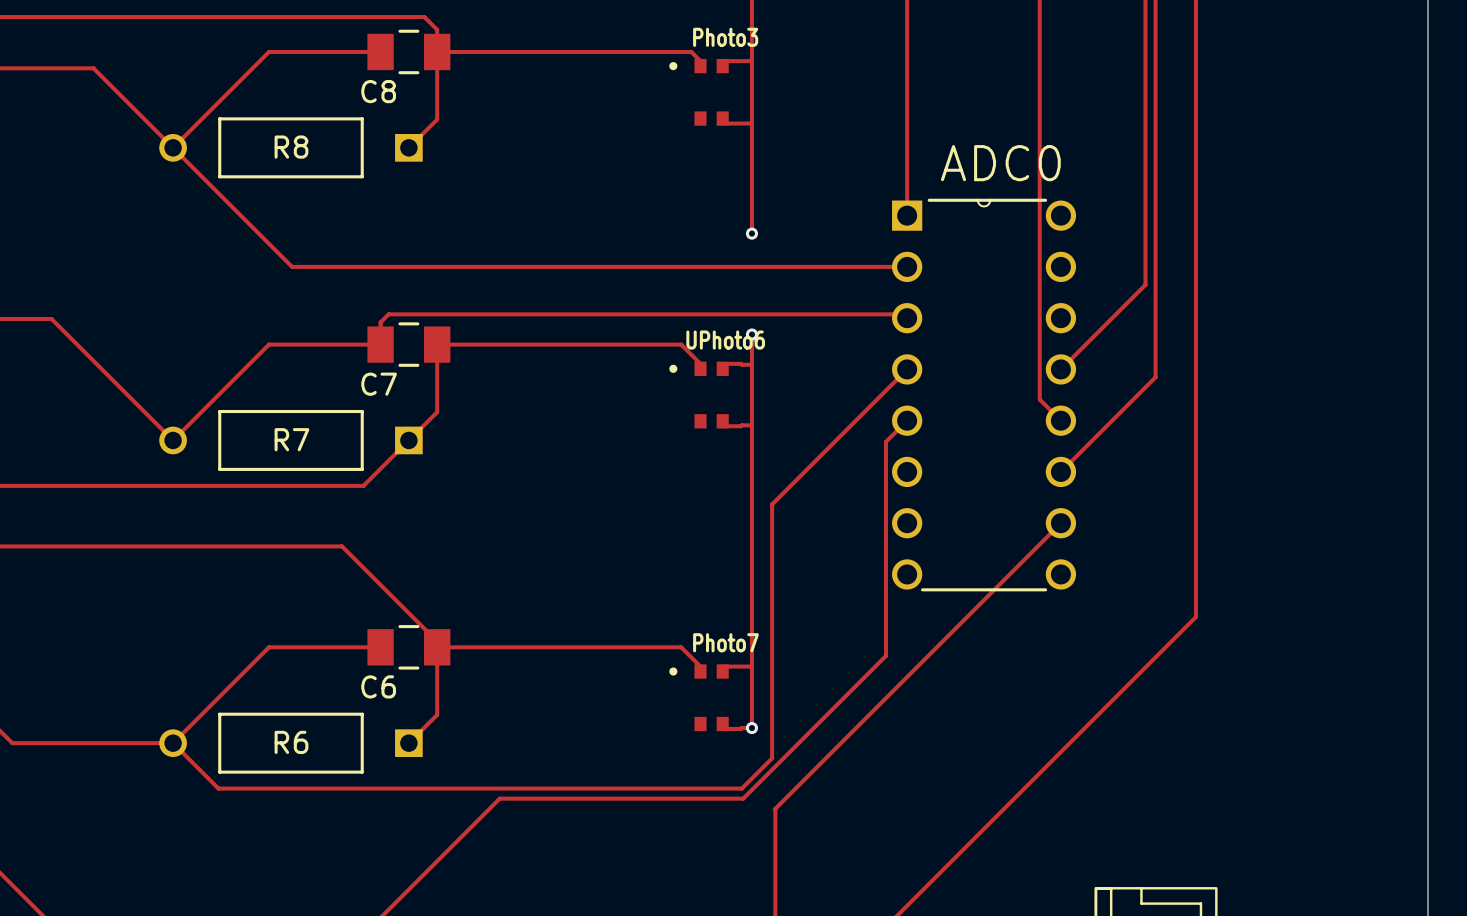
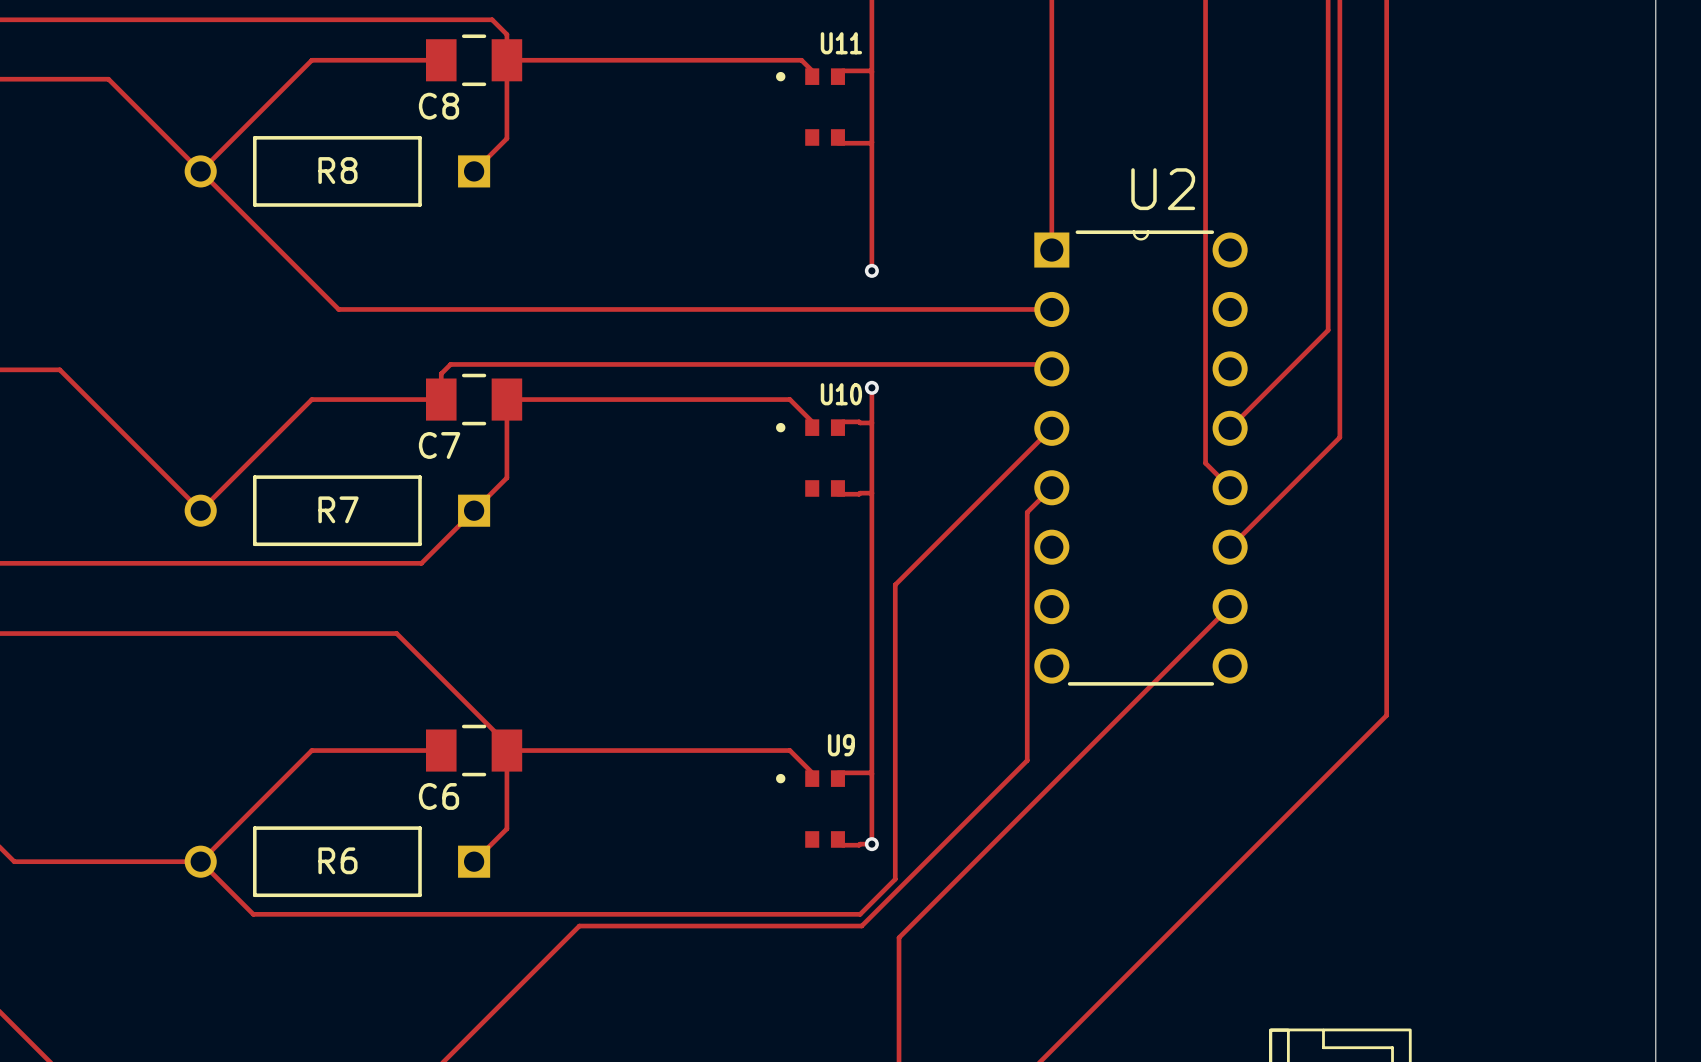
Photo3 name: Photo3 (725, 37) -> U11 (841, 43)
ADC0 name: ADC0 (1000, 163) -> U2 (1163, 189)
UPhoto6 name: UPhoto6 (725, 340) -> U10 (841, 394)
Photo7 name: Photo7 (725, 642) -> U9 (841, 745)

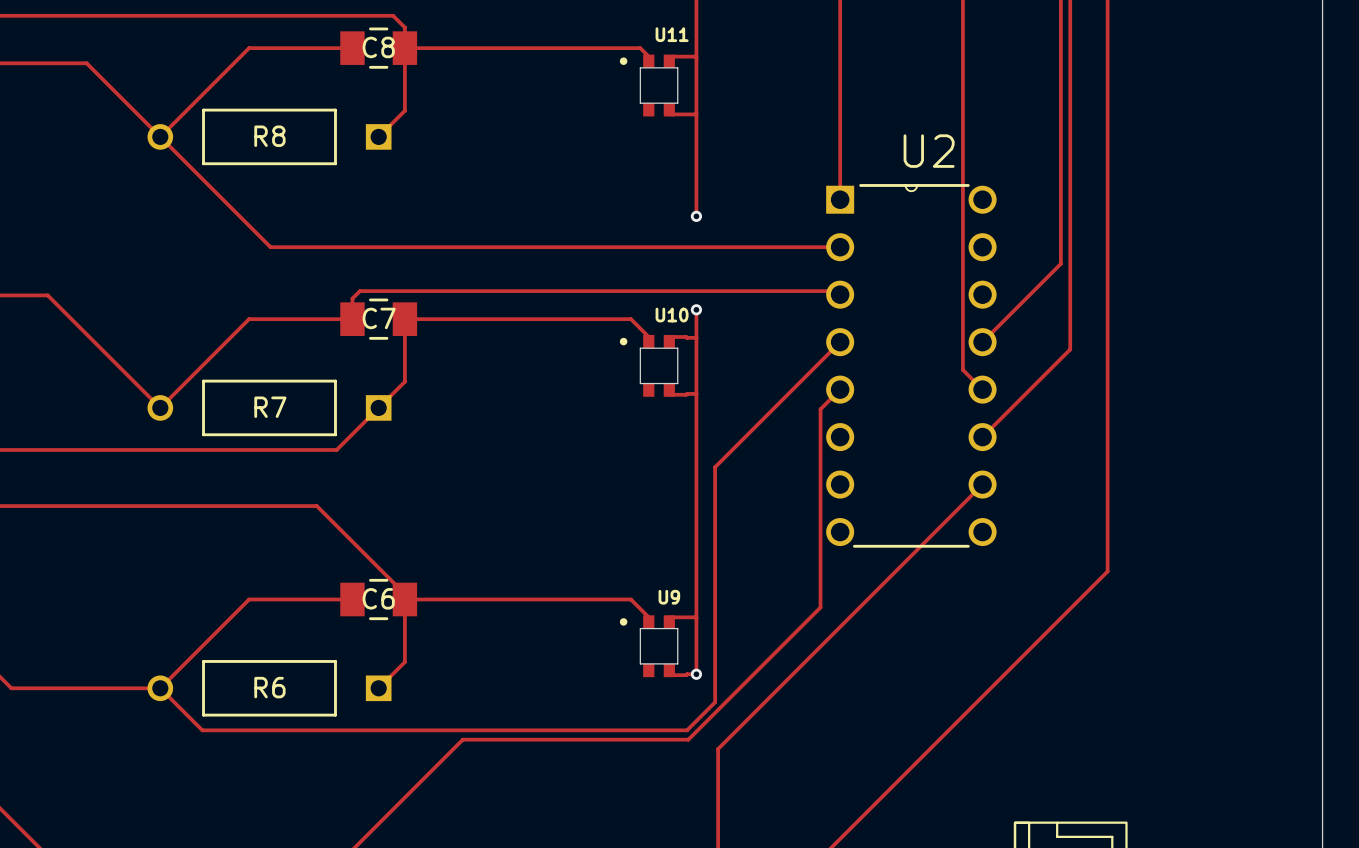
U11 footprint: [776, 68, 845, 146] -> [619, 54, 678, 117]
C8 name position: C8 (439, 106) -> C8 (378, 47)
U10 footprint: [776, 419, 845, 497] -> [619, 334, 678, 397]
C7 name position: C7 (439, 445) -> C7 (379, 318)
U9 footprint: [776, 770, 845, 848] -> [619, 615, 678, 678]
C6 name position: C6 (439, 796) -> C6 (378, 598)

